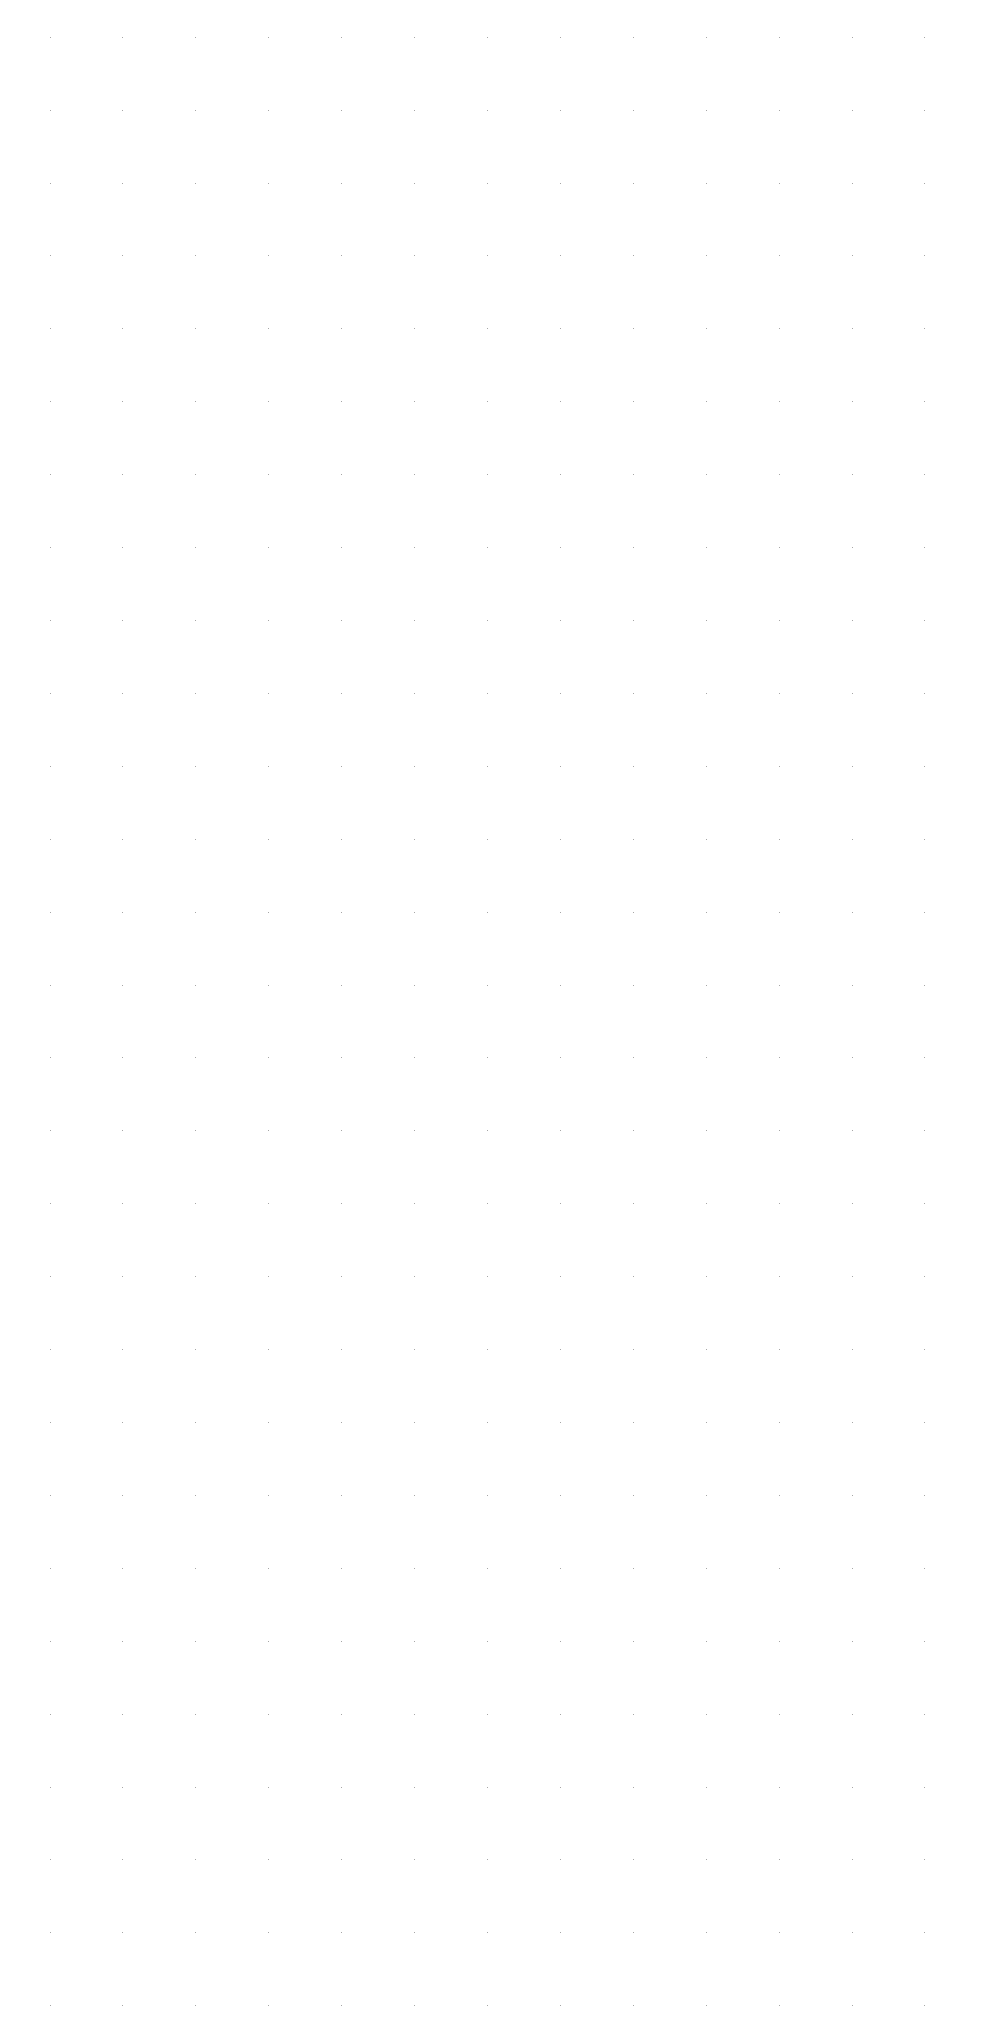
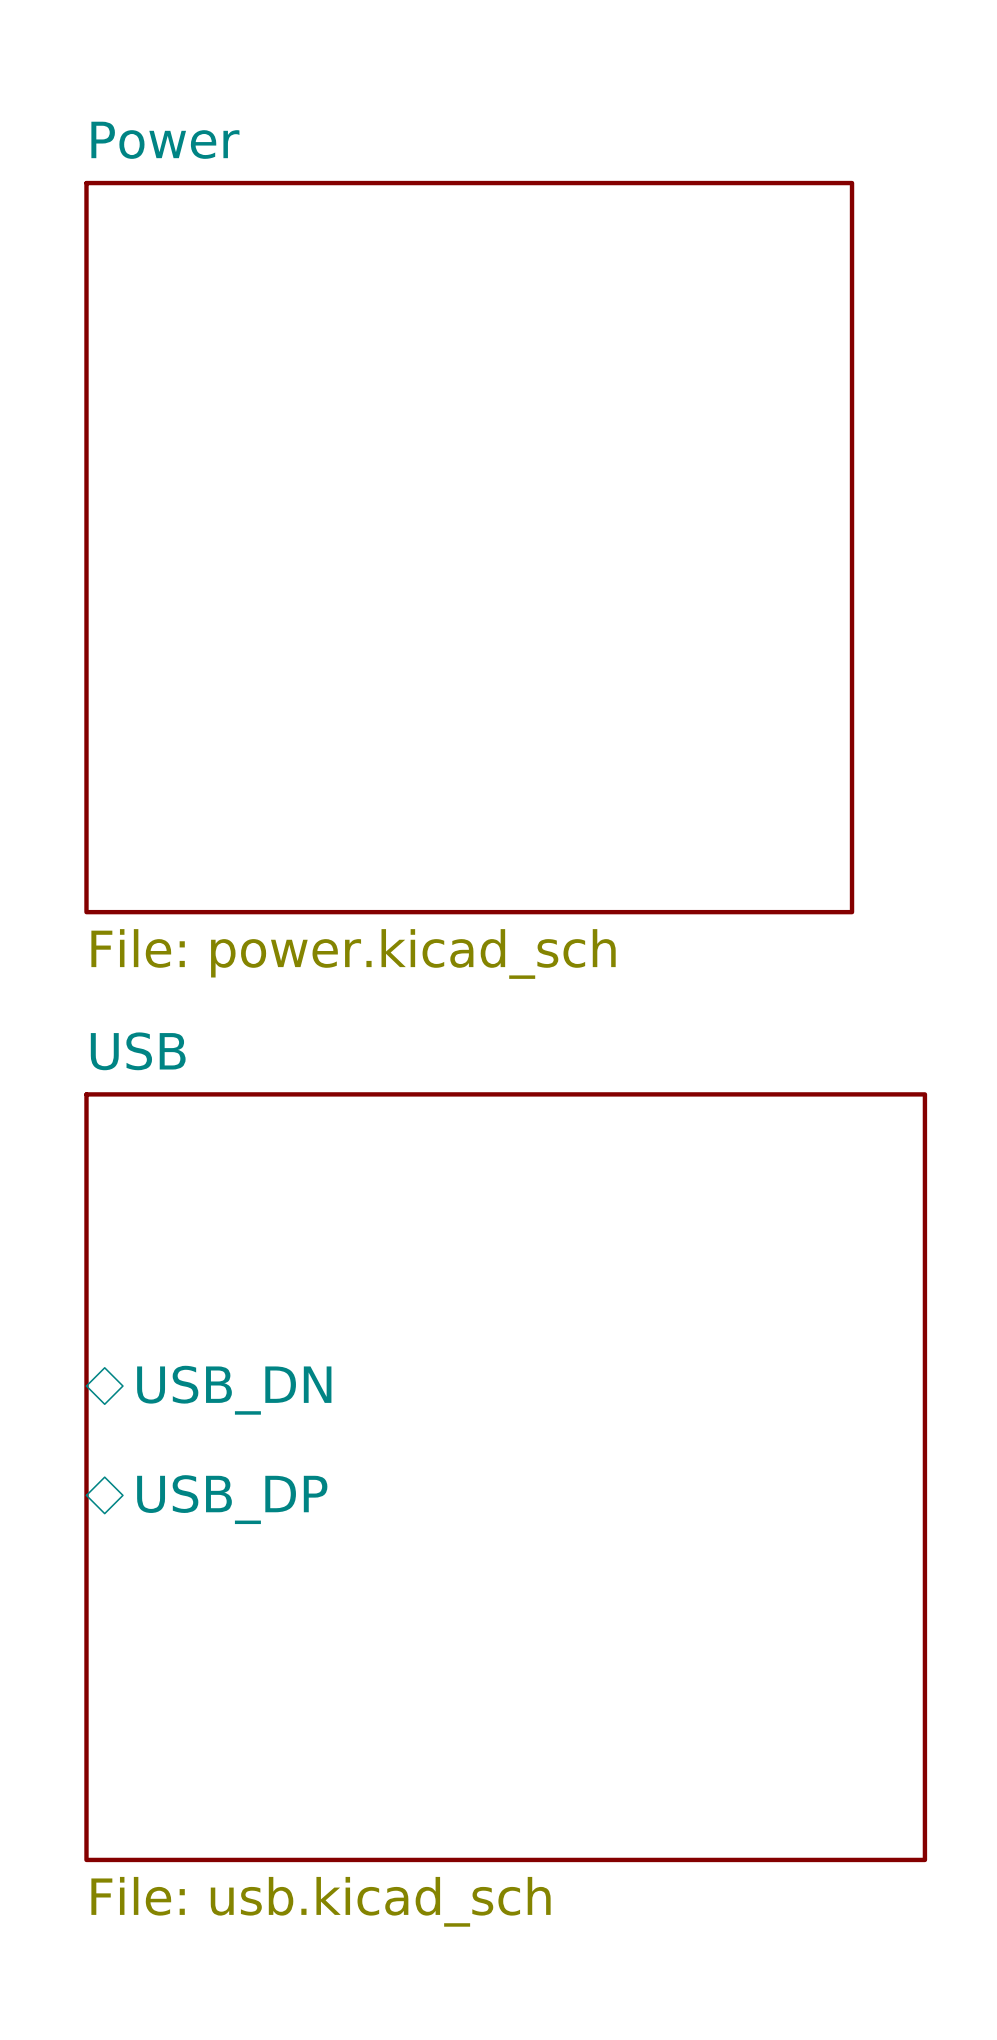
sheet Power: none -> File: power.kicad_sch (469, 547)
sheet pin: none -> USB_DN (234, 1390)
sheet USB: none -> File: usb.kicad_sch (505, 1477)
sheet pin: none -> USB_DP (232, 1499)

